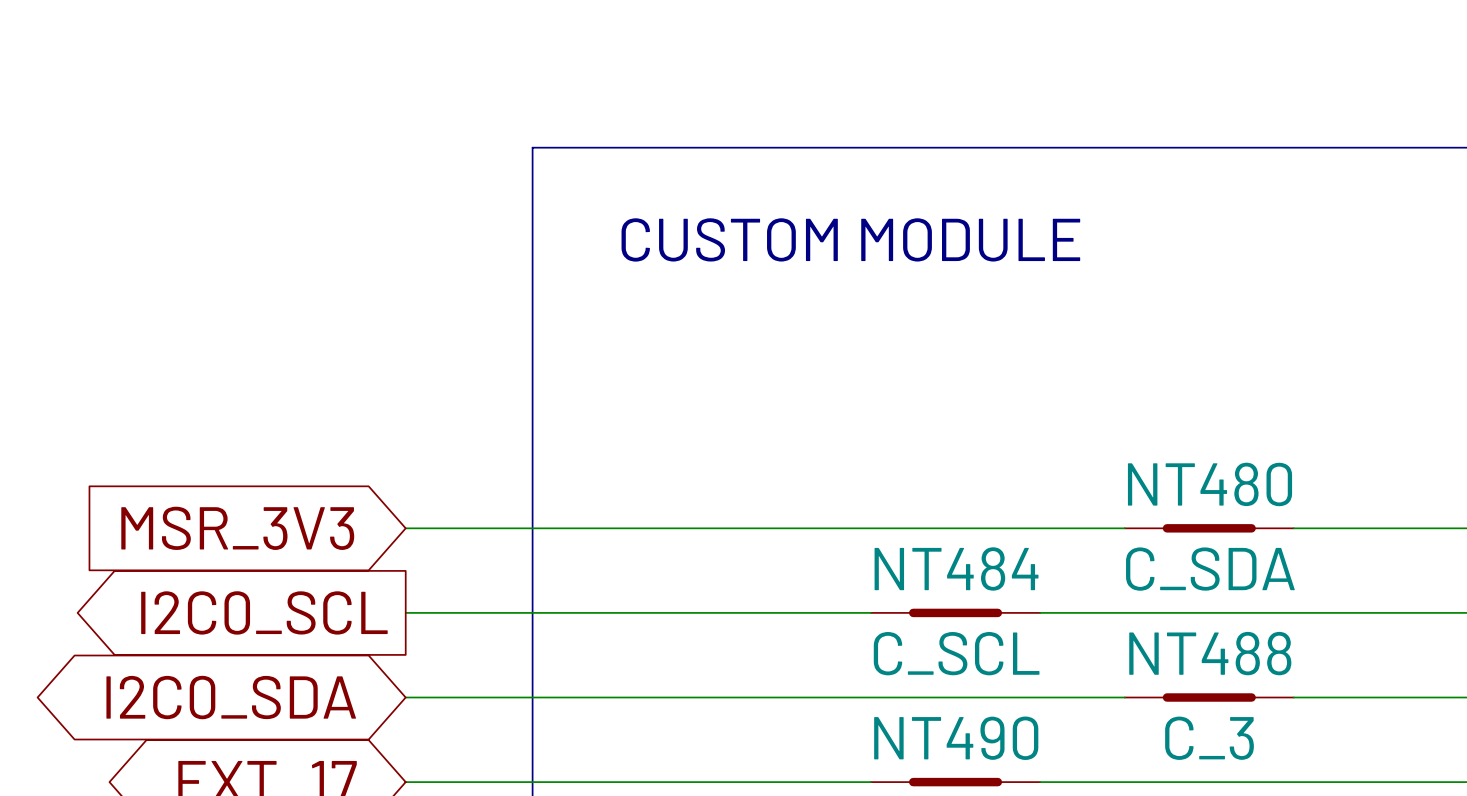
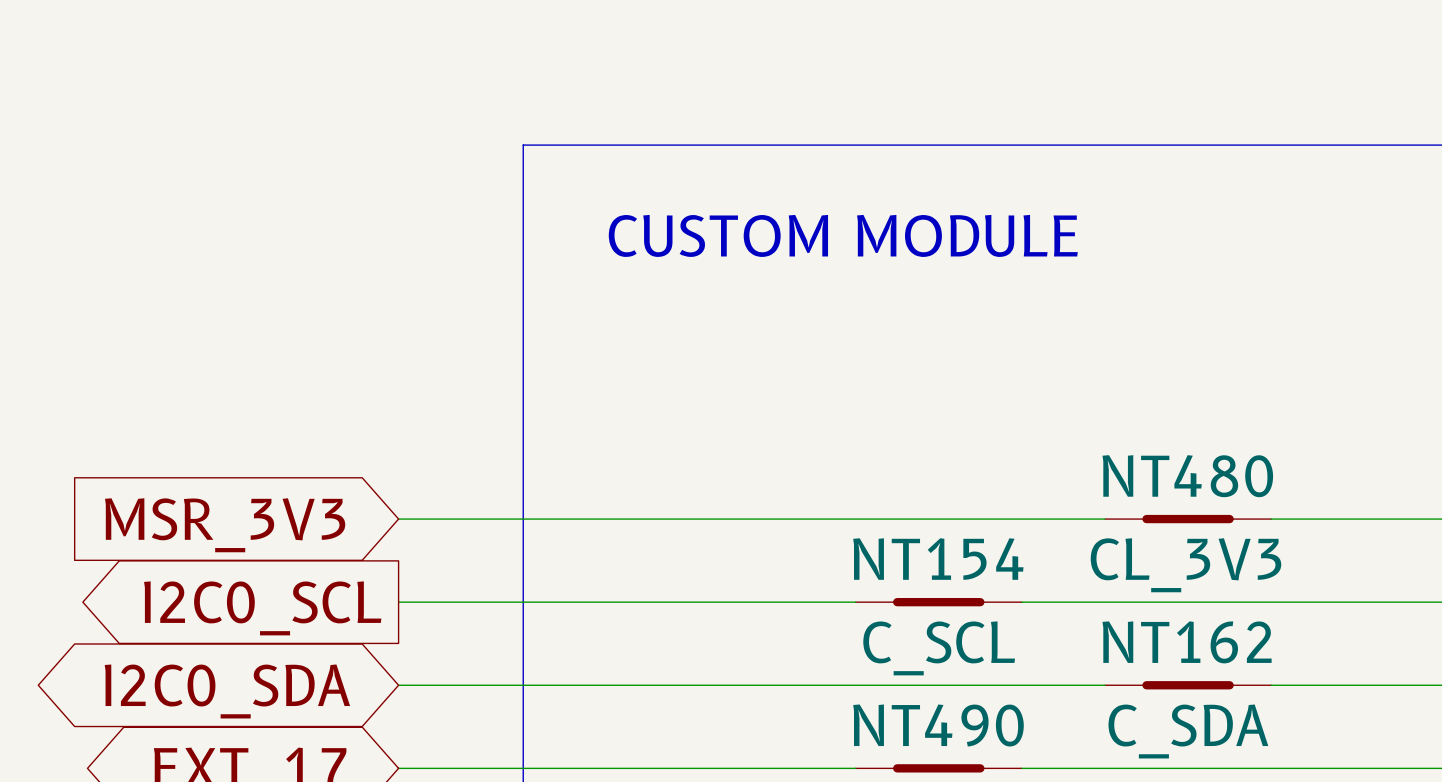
NT484 name: NT484 (956, 568) -> NT154 (938, 559)
NT480 value: C_SDA (1210, 569) -> CL_3V3 (1185, 565)
NT488 name: NT488 (1210, 653) -> NT162 (1187, 642)
NT488 value: C_3 (1209, 738) -> C_SDA (1188, 731)

